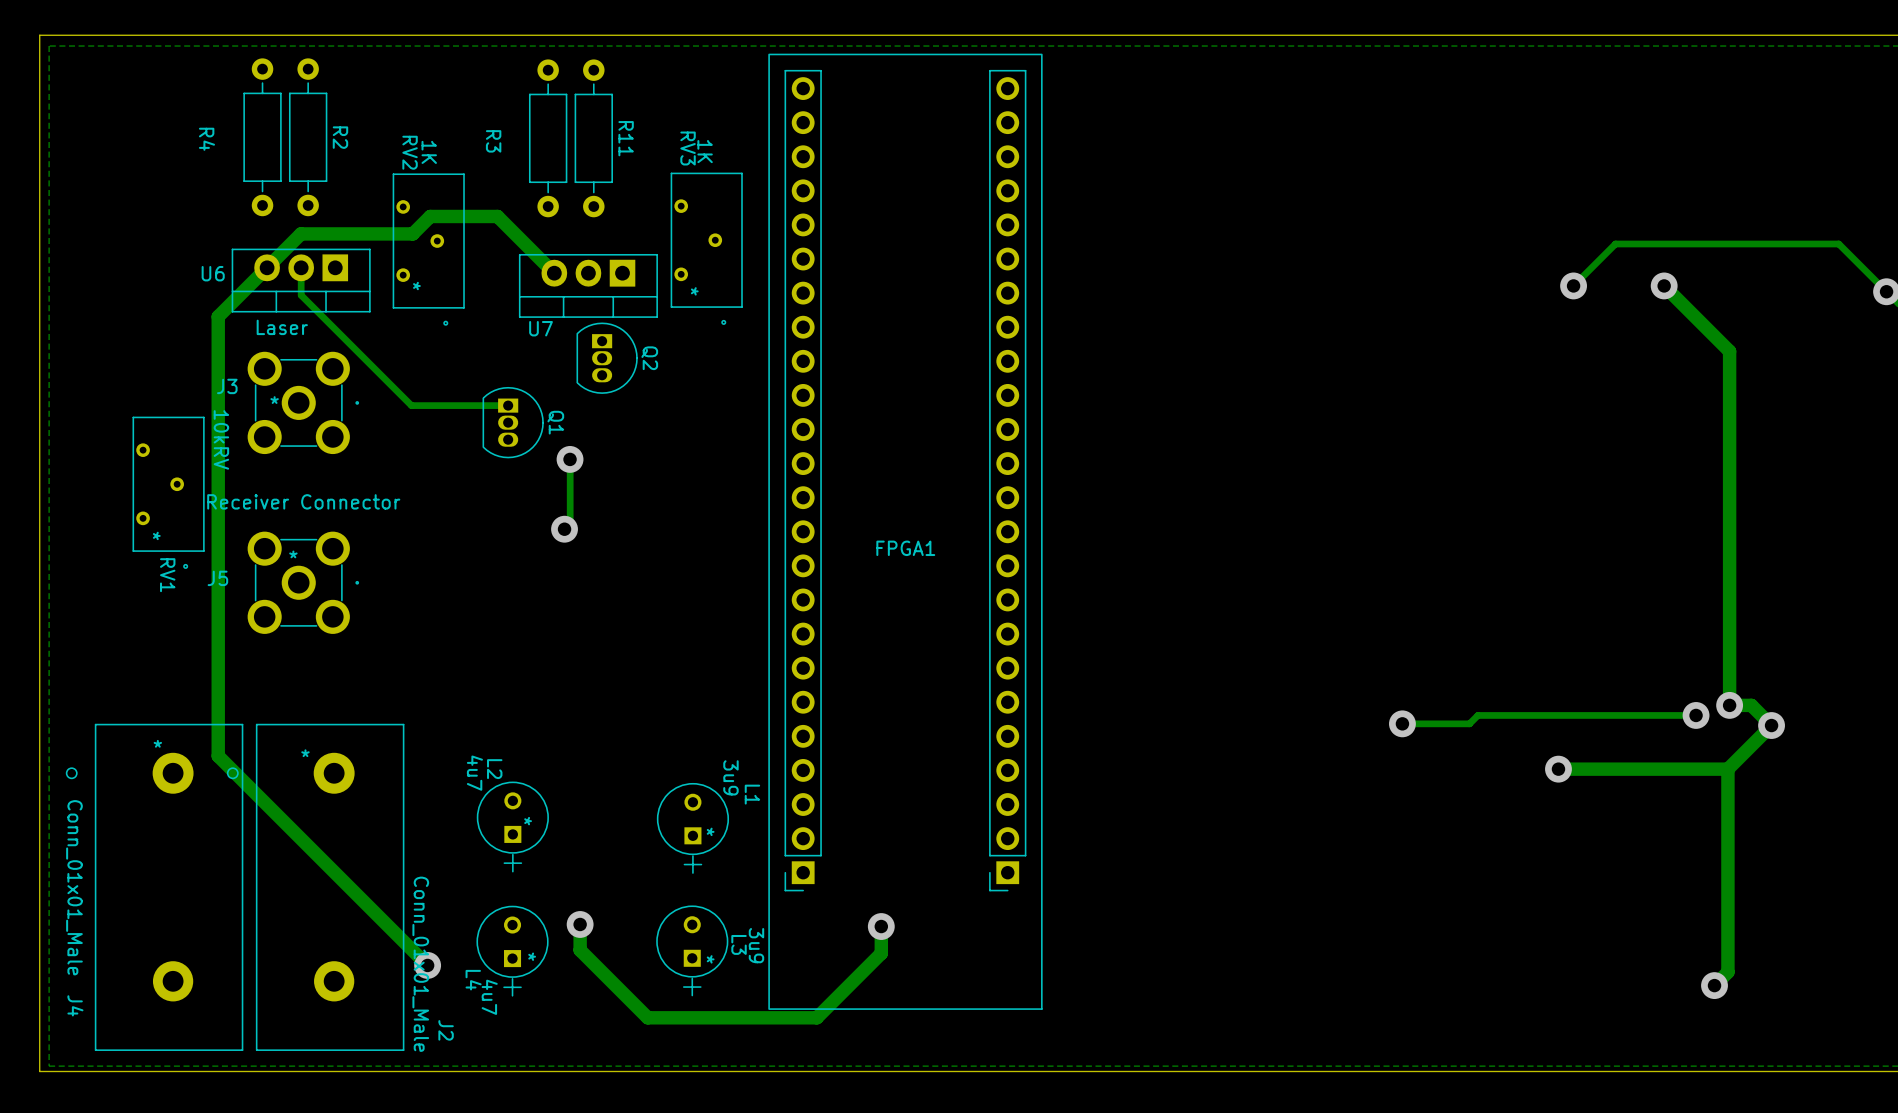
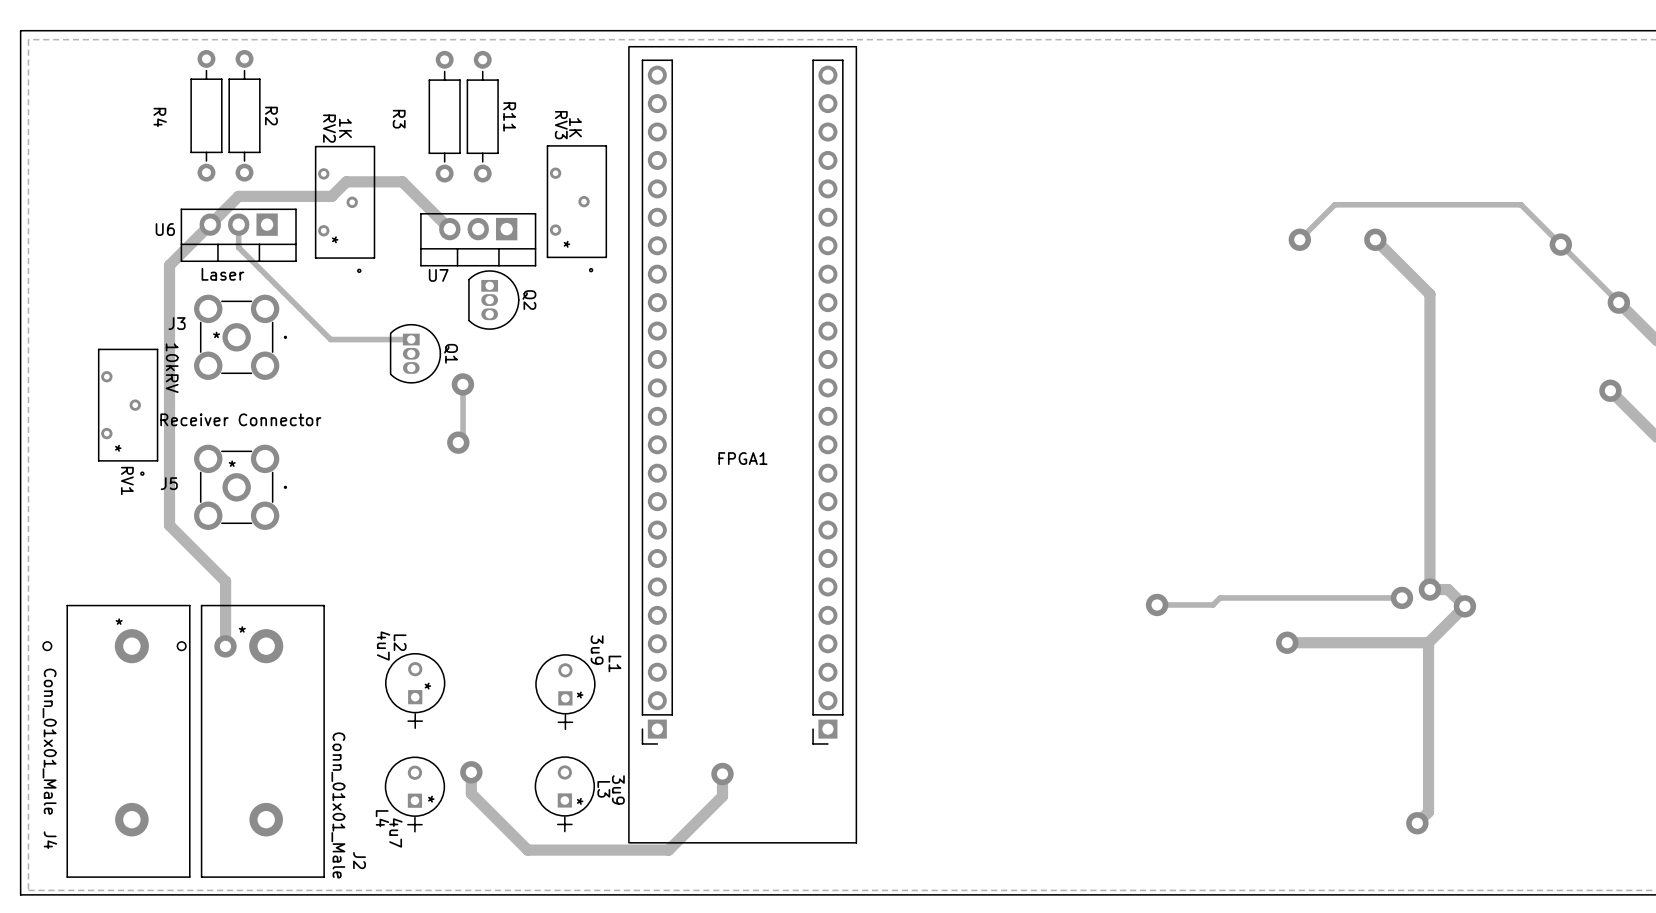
track: (218, 628) (218, 756) (427, 965) -> (169, 525) (225, 581) (225, 646)
via: none -> (225, 646)
via: (427, 965) -> none

